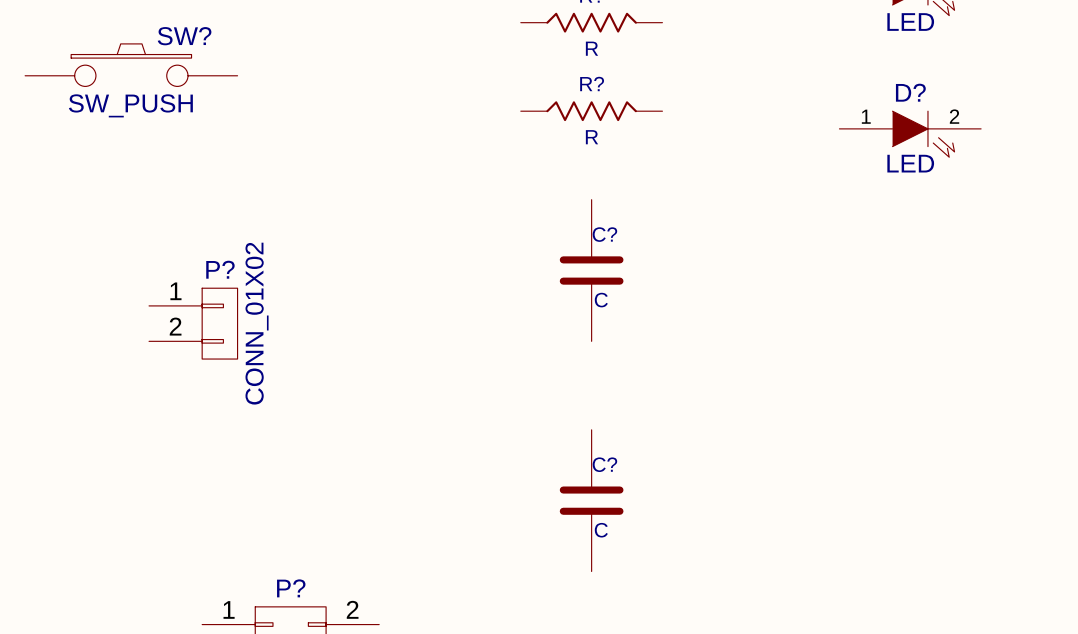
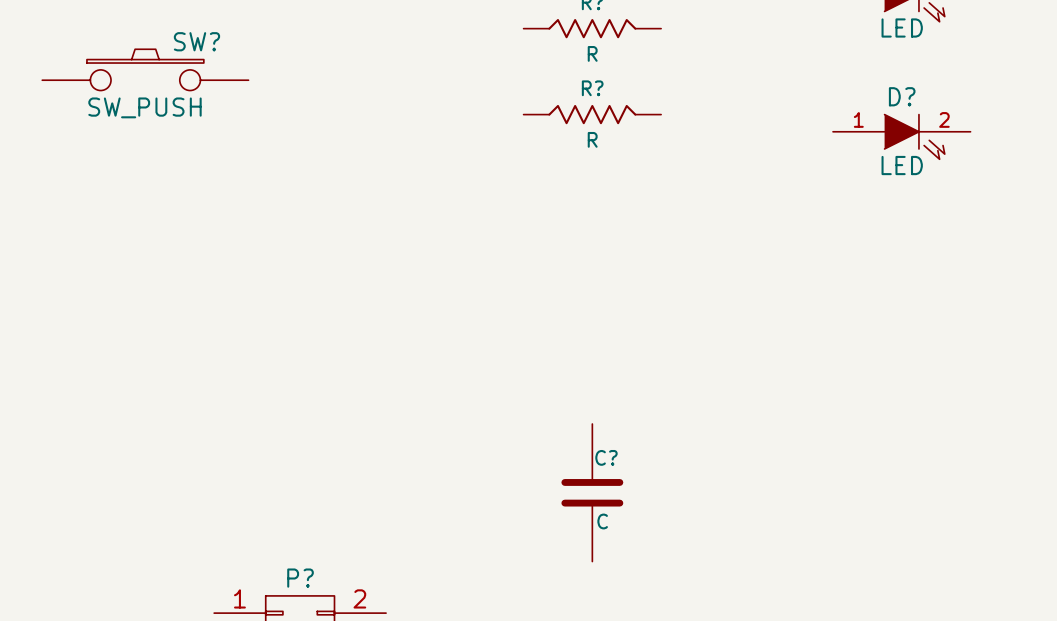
C?: C (591, 270) -> none
P?: CONN_01X02 (193, 323) -> none

